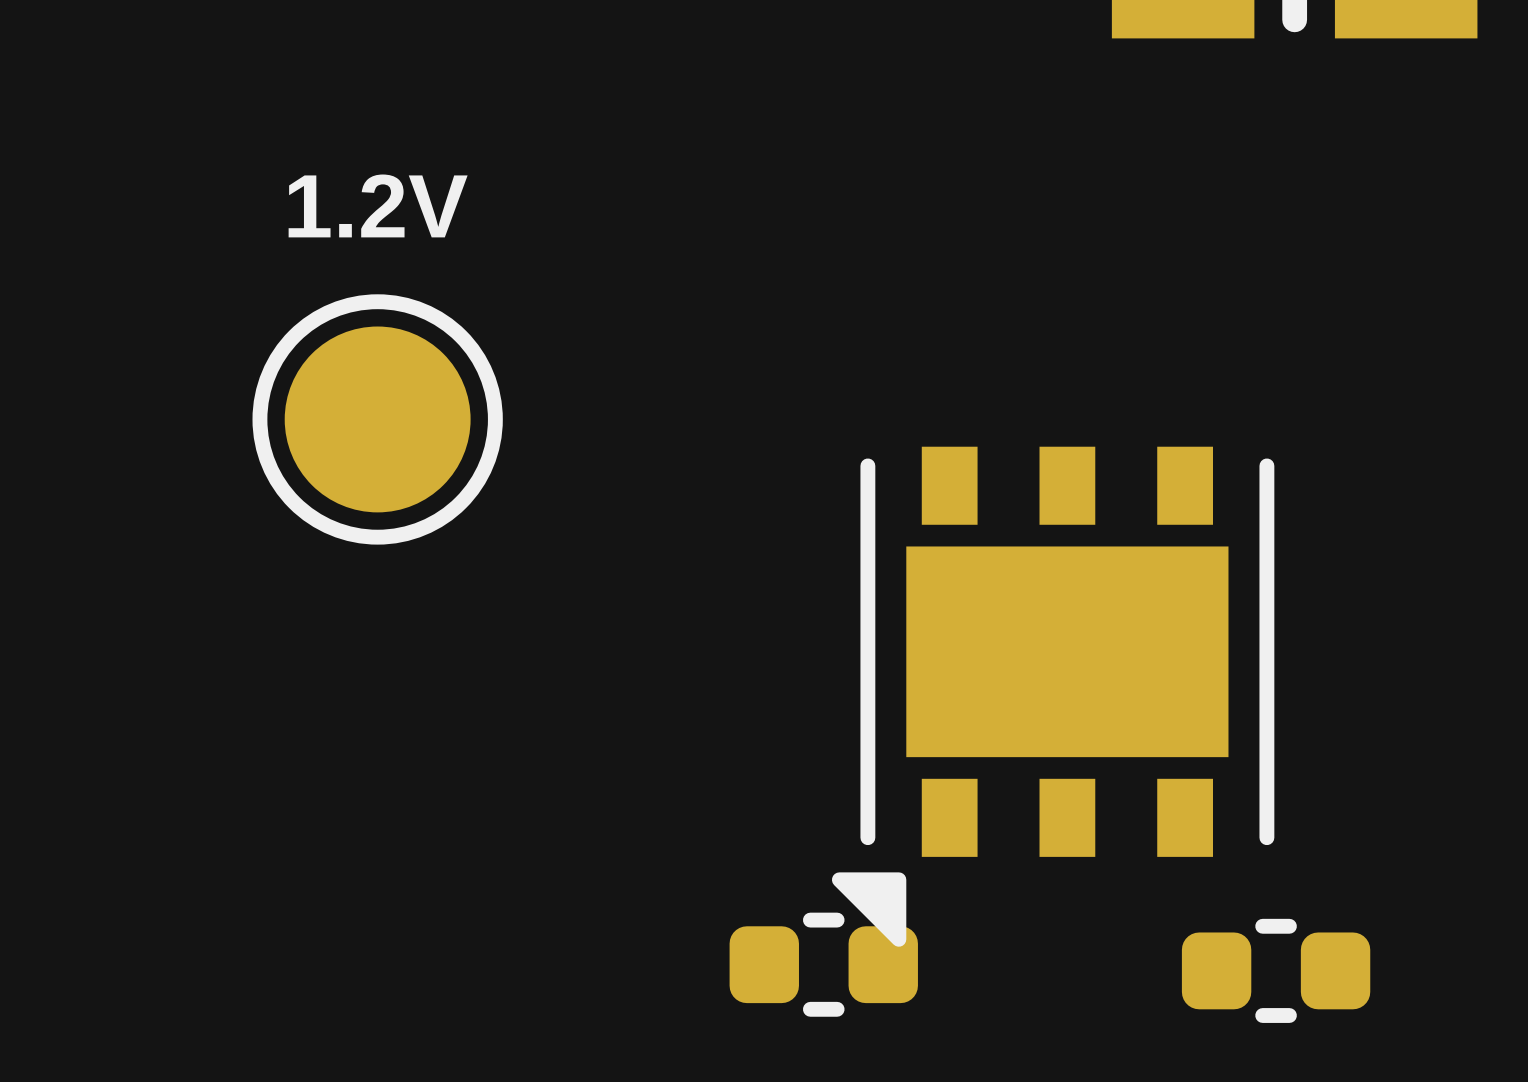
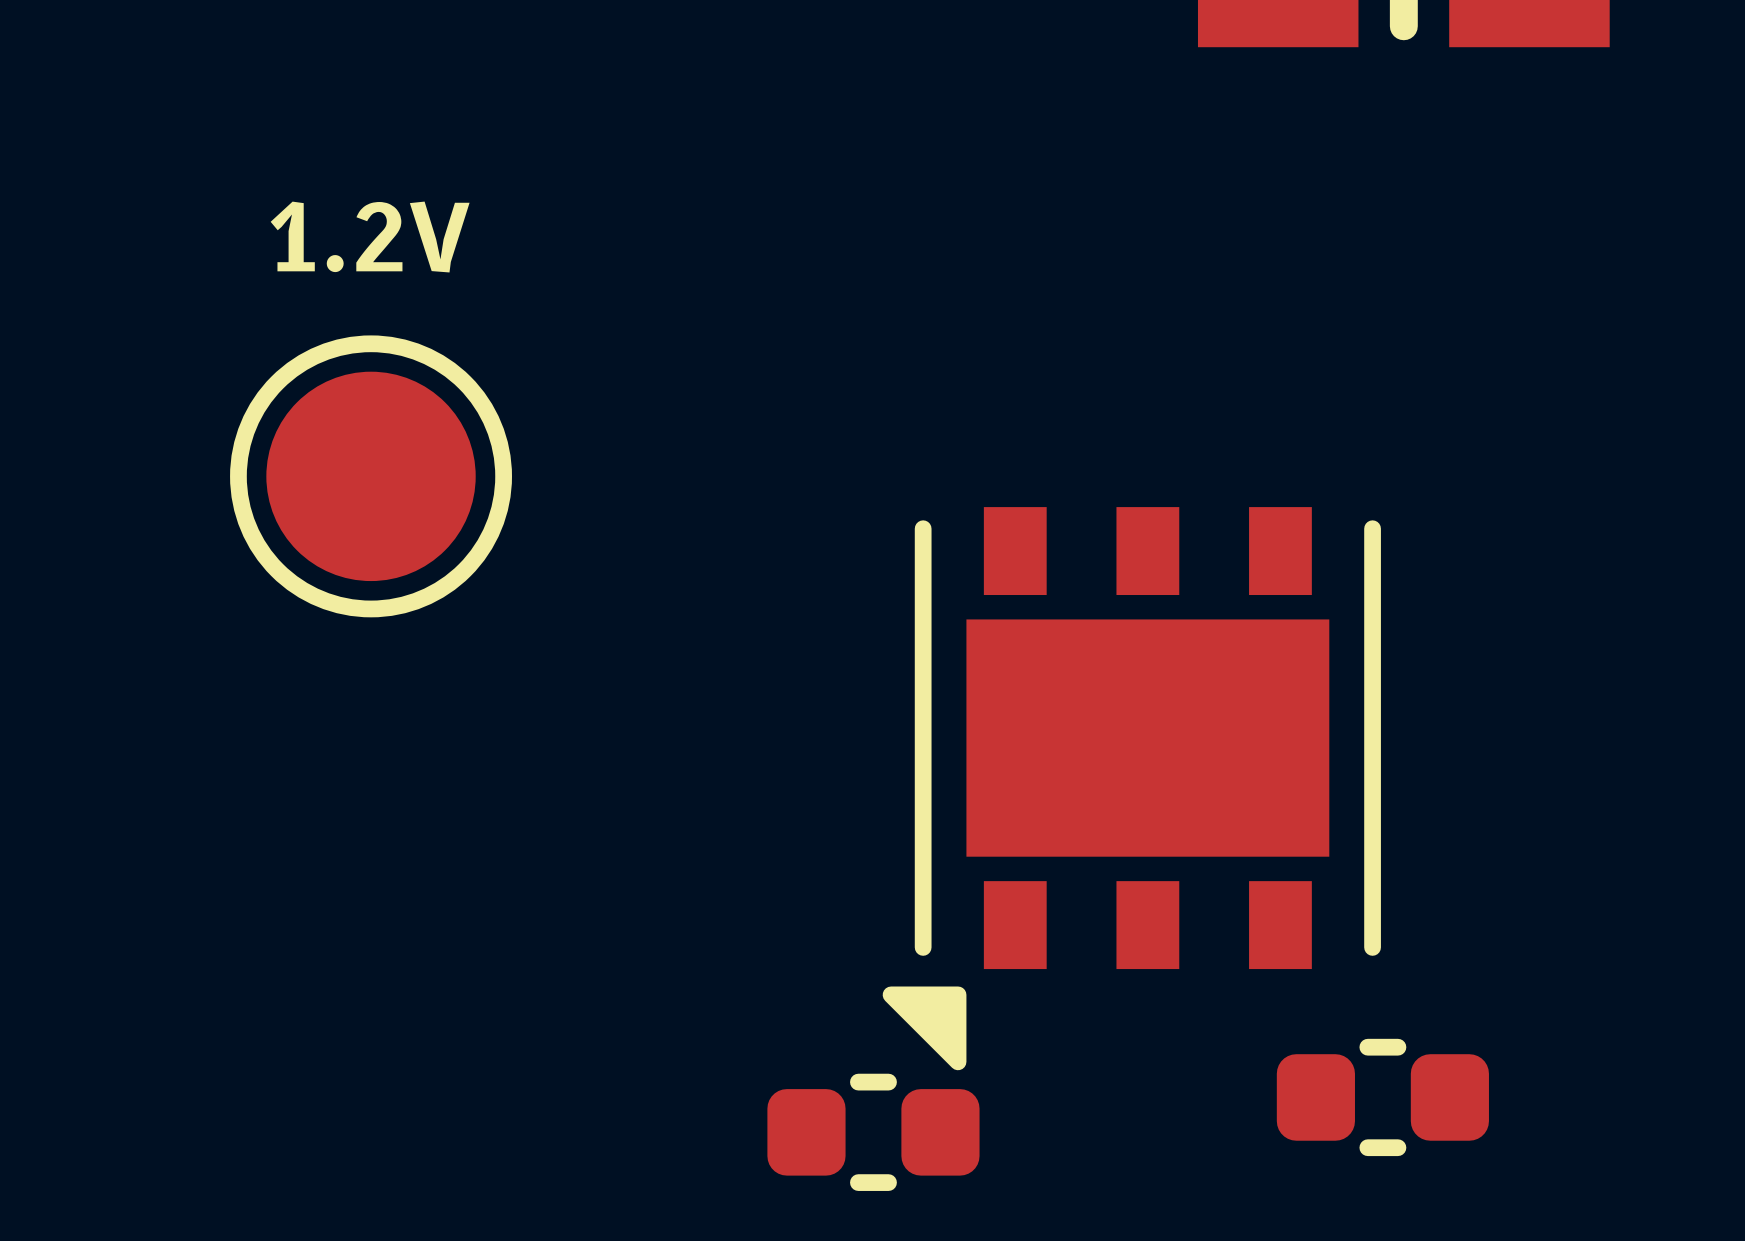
part position: (823, 964) -> (873, 1132)

